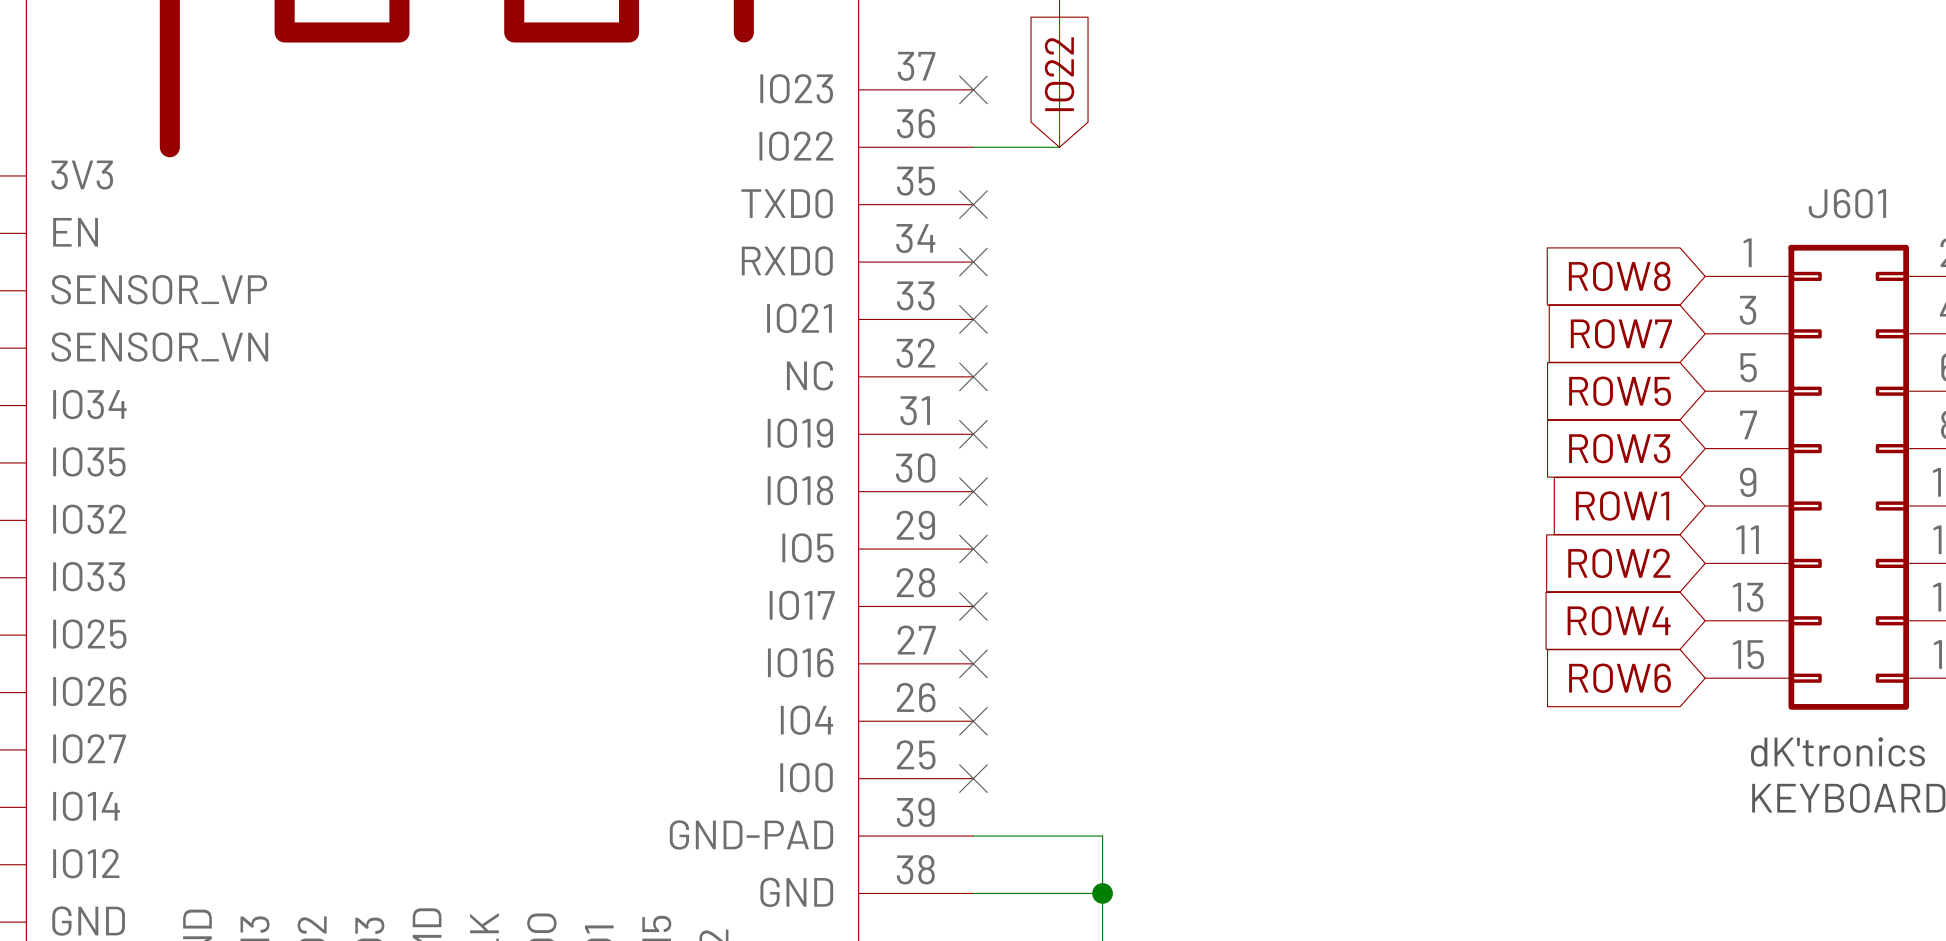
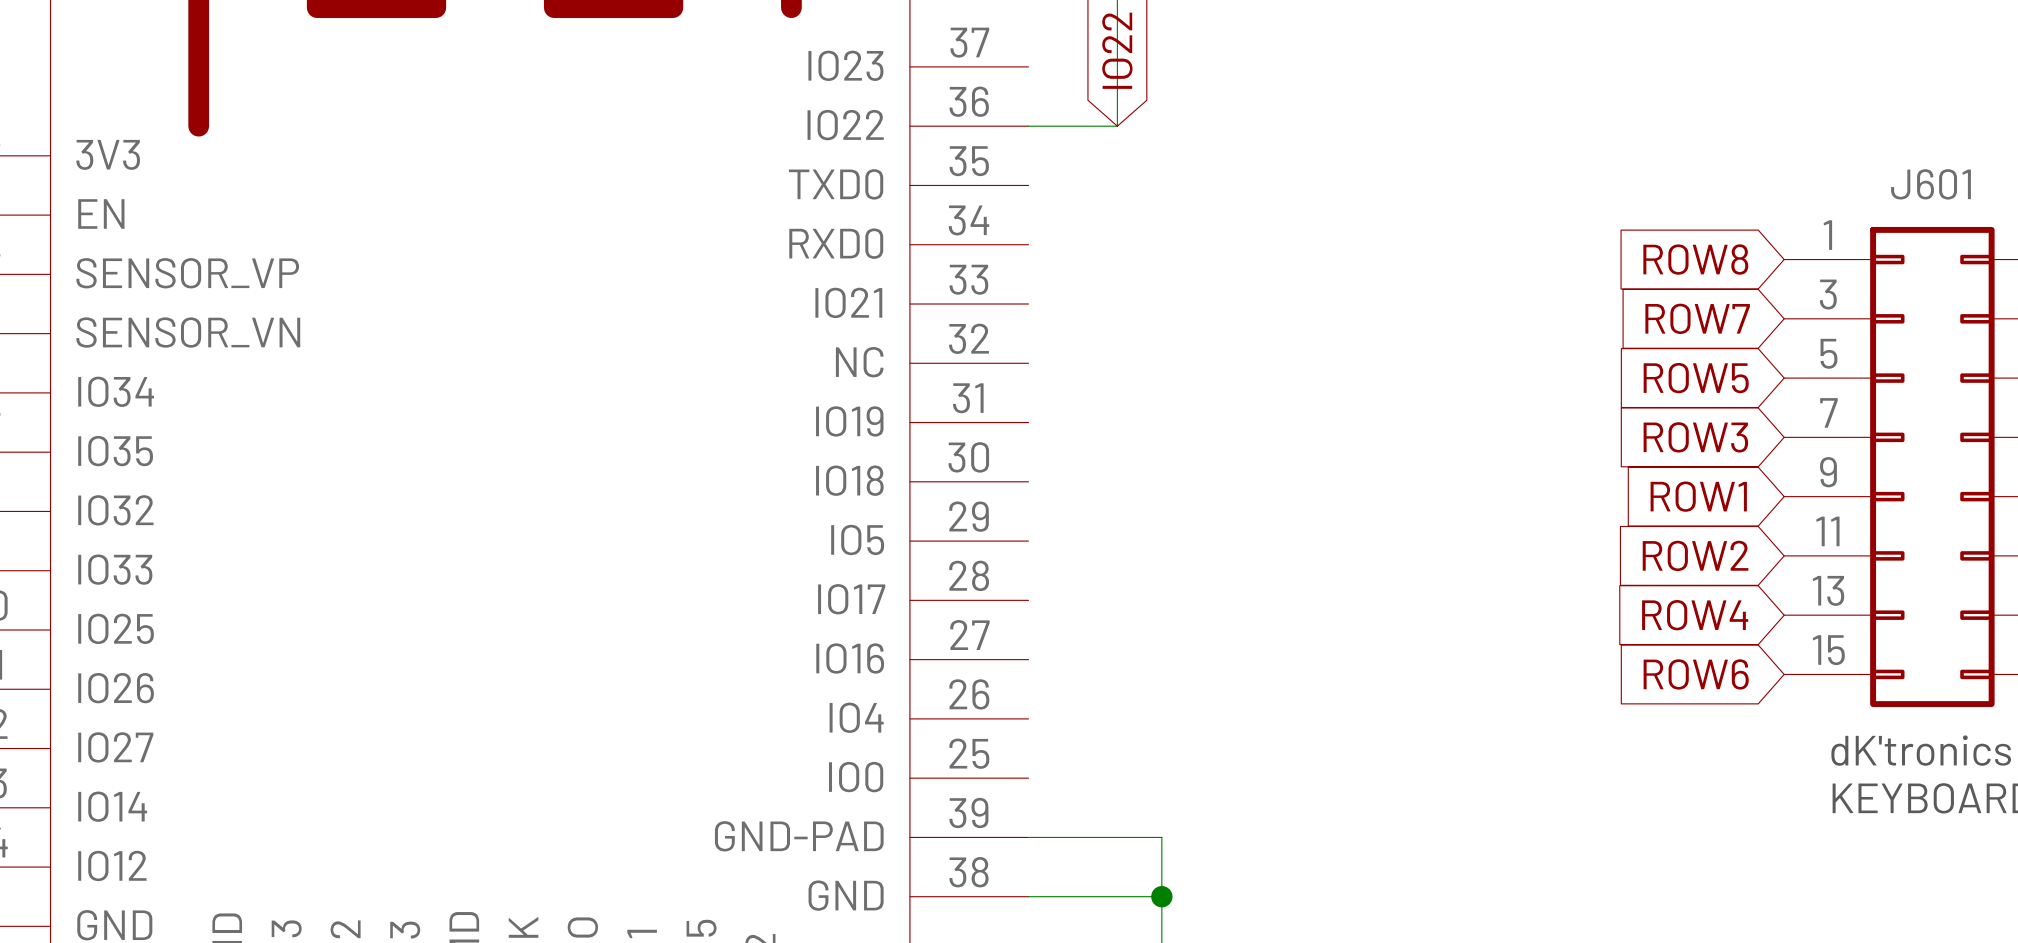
no-connect mark: (973, 89) -> none
no-connect mark: (973, 204) -> none
no-connect mark: (973, 262) -> none
no-connect mark: (973, 319) -> none
no-connect mark: (973, 376) -> none
no-connect mark: (973, 434) -> none
no-connect mark: (973, 491) -> none
no-connect mark: (973, 549) -> none
no-connect mark: (973, 606) -> none
no-connect mark: (973, 663) -> none
no-connect mark: (973, 721) -> none
no-connect mark: (973, 778) -> none

